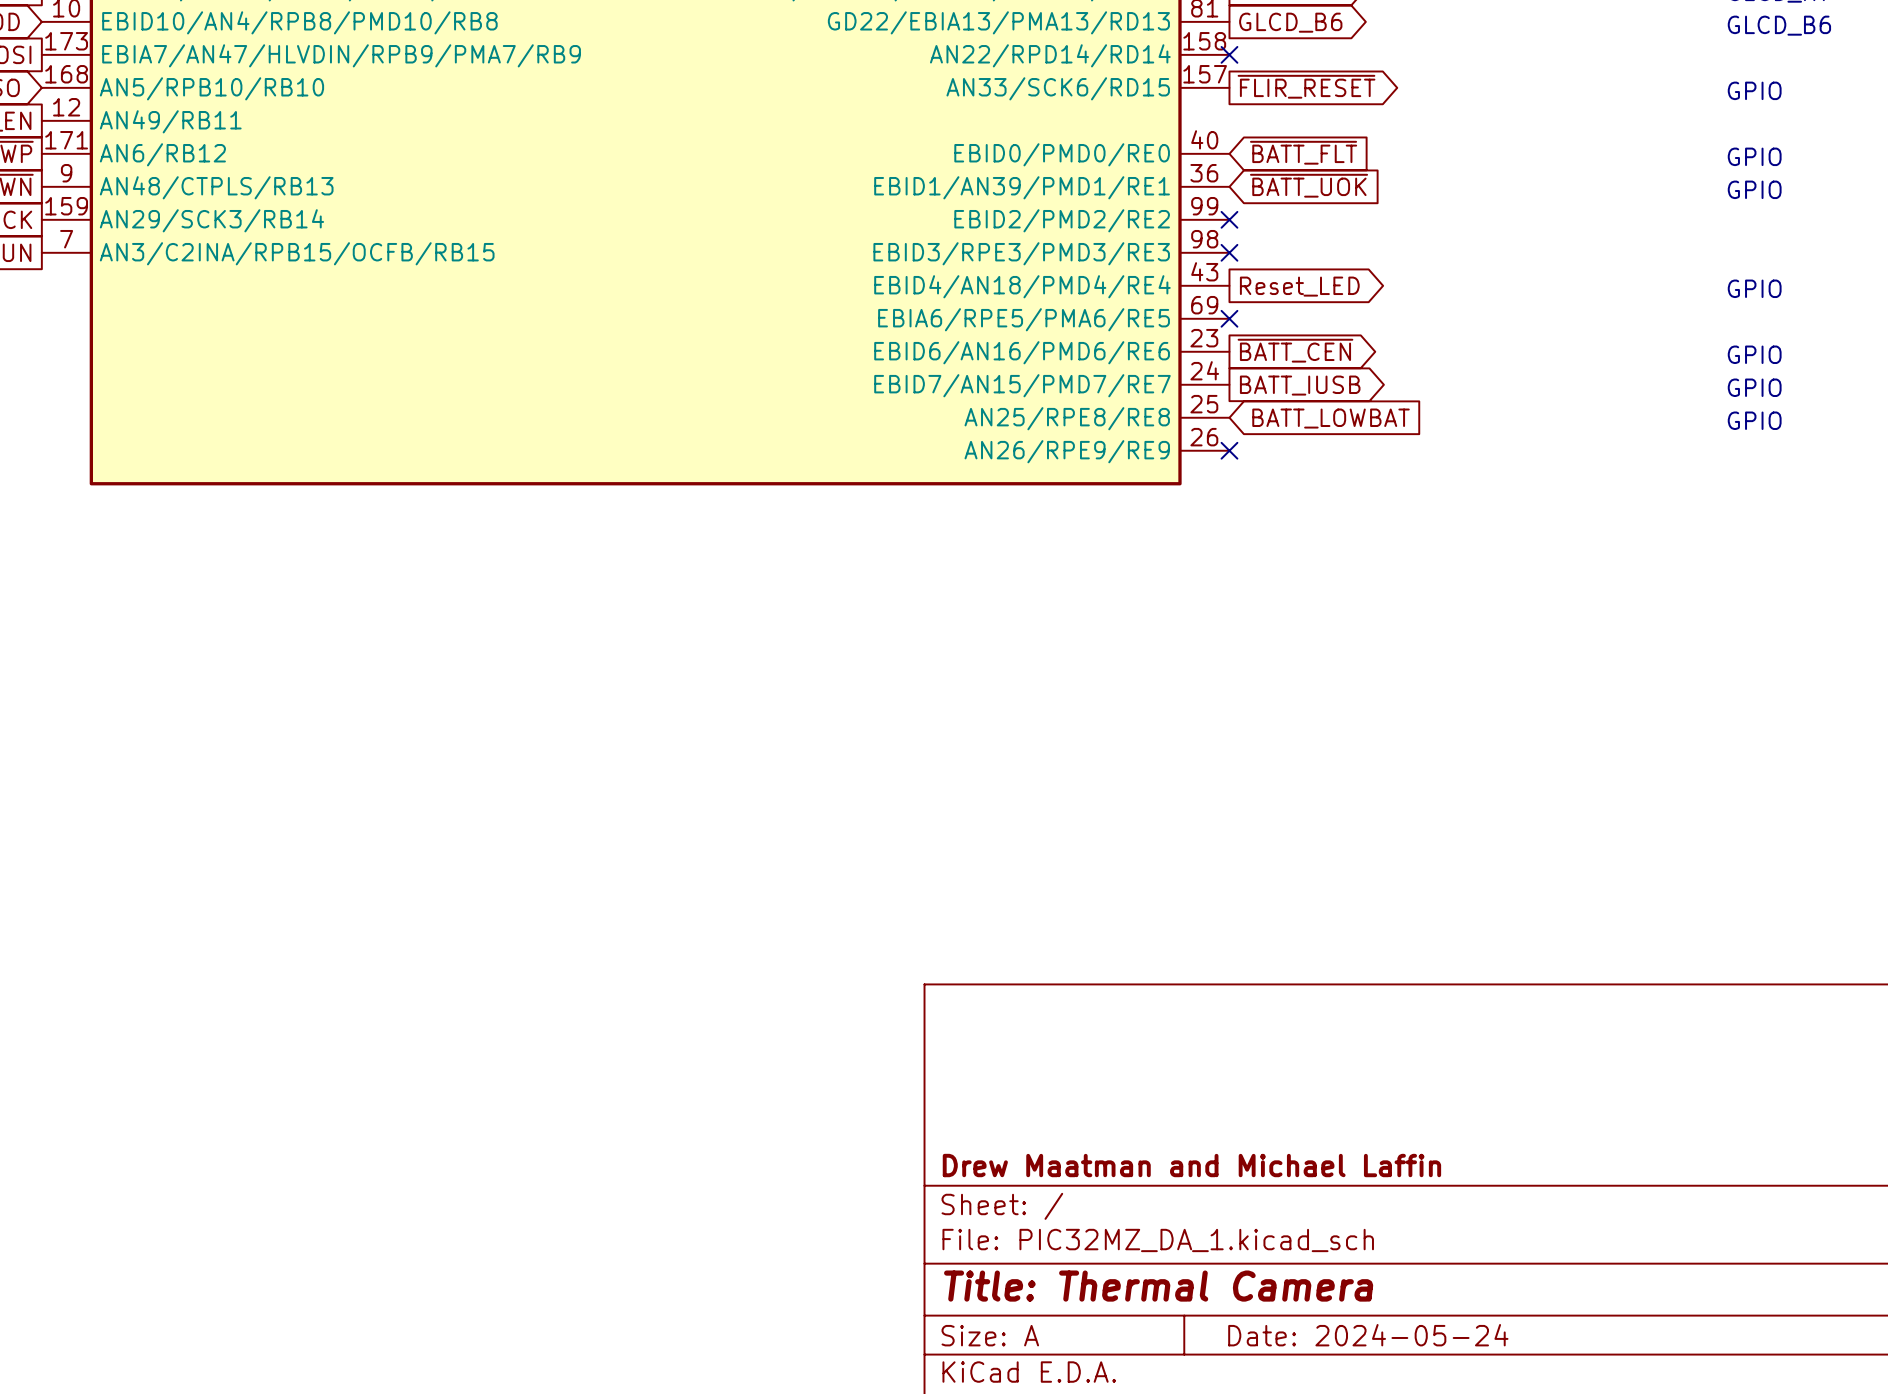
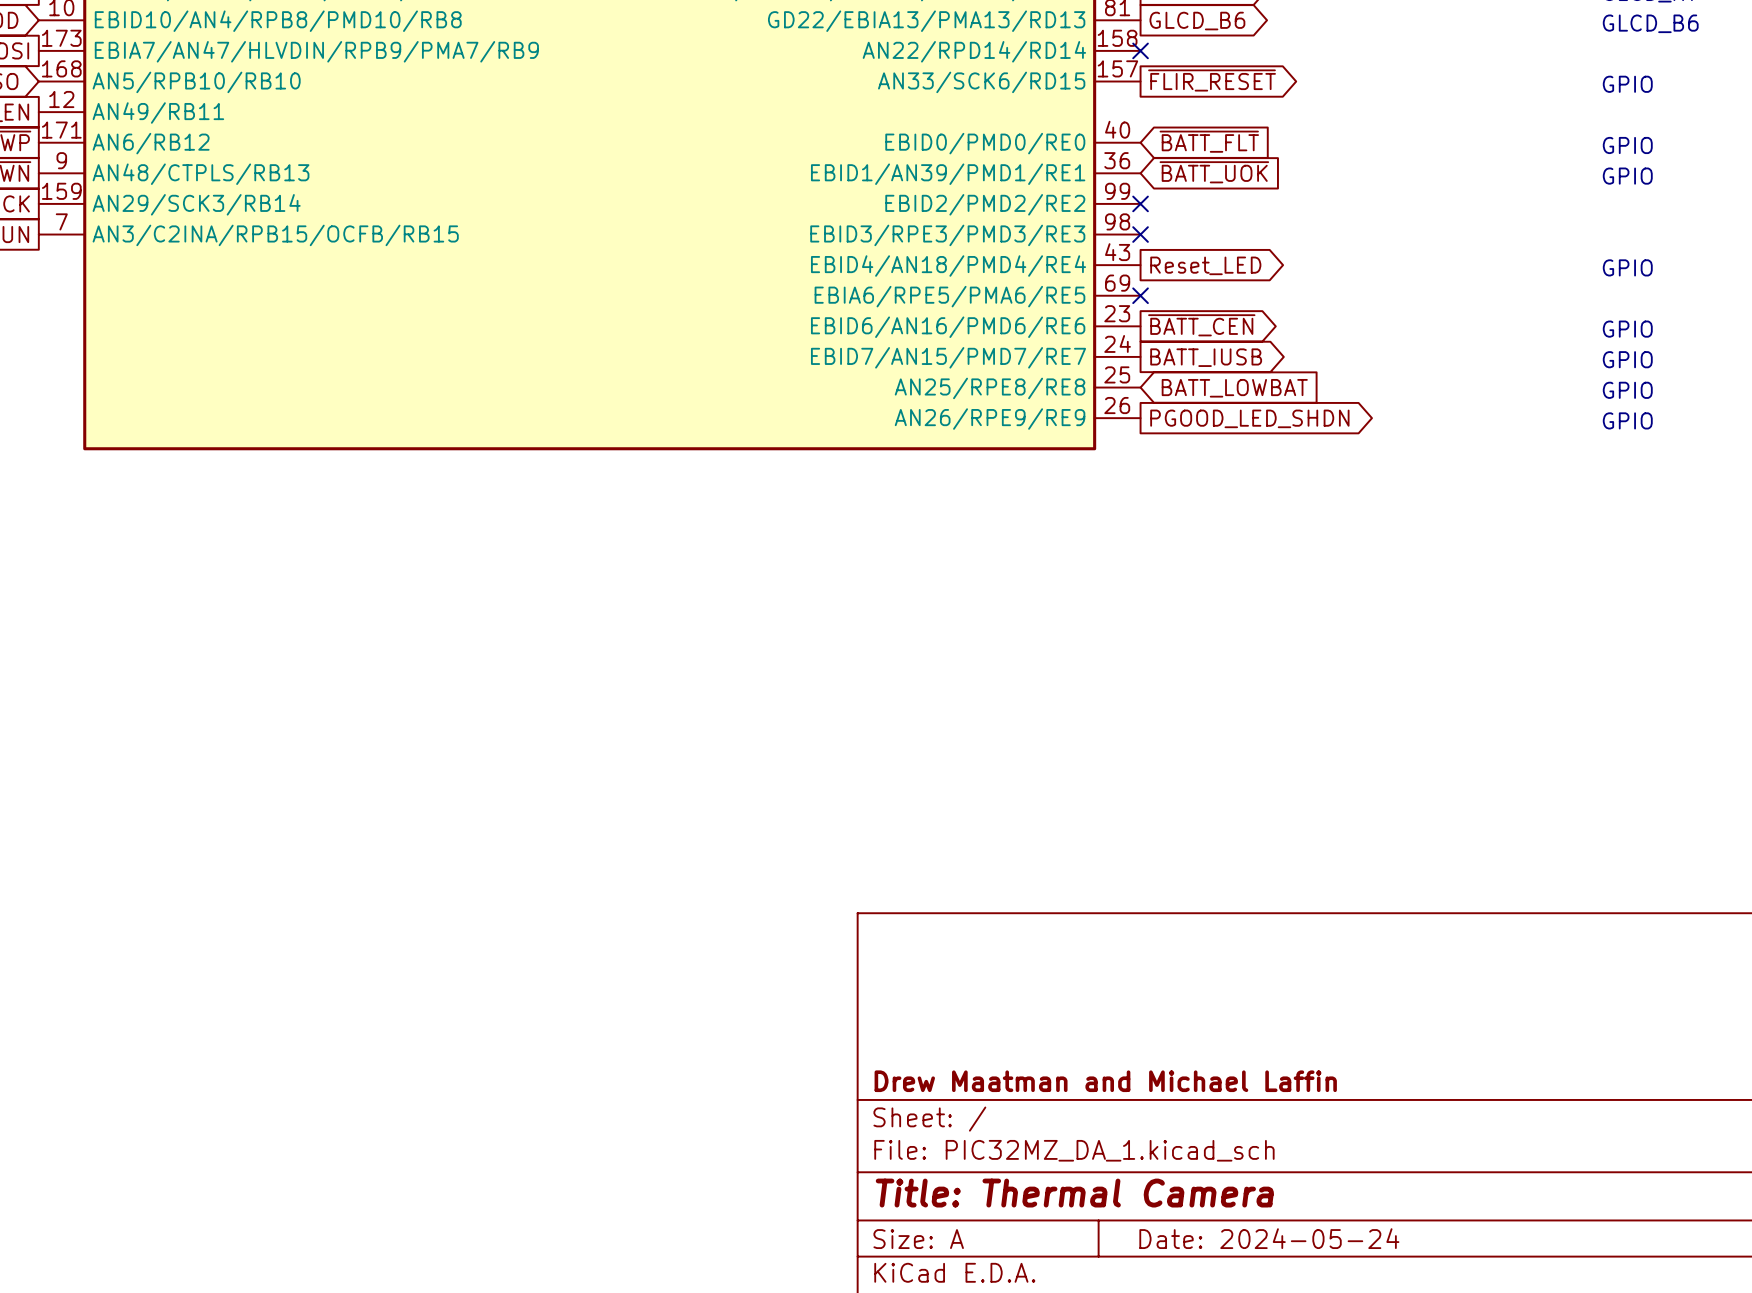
no-connect mark: (1229, 450) -> none
global label: none -> PGOOD_LED_SHDN (1249, 418)
text: none -> GPIO (1627, 420)

